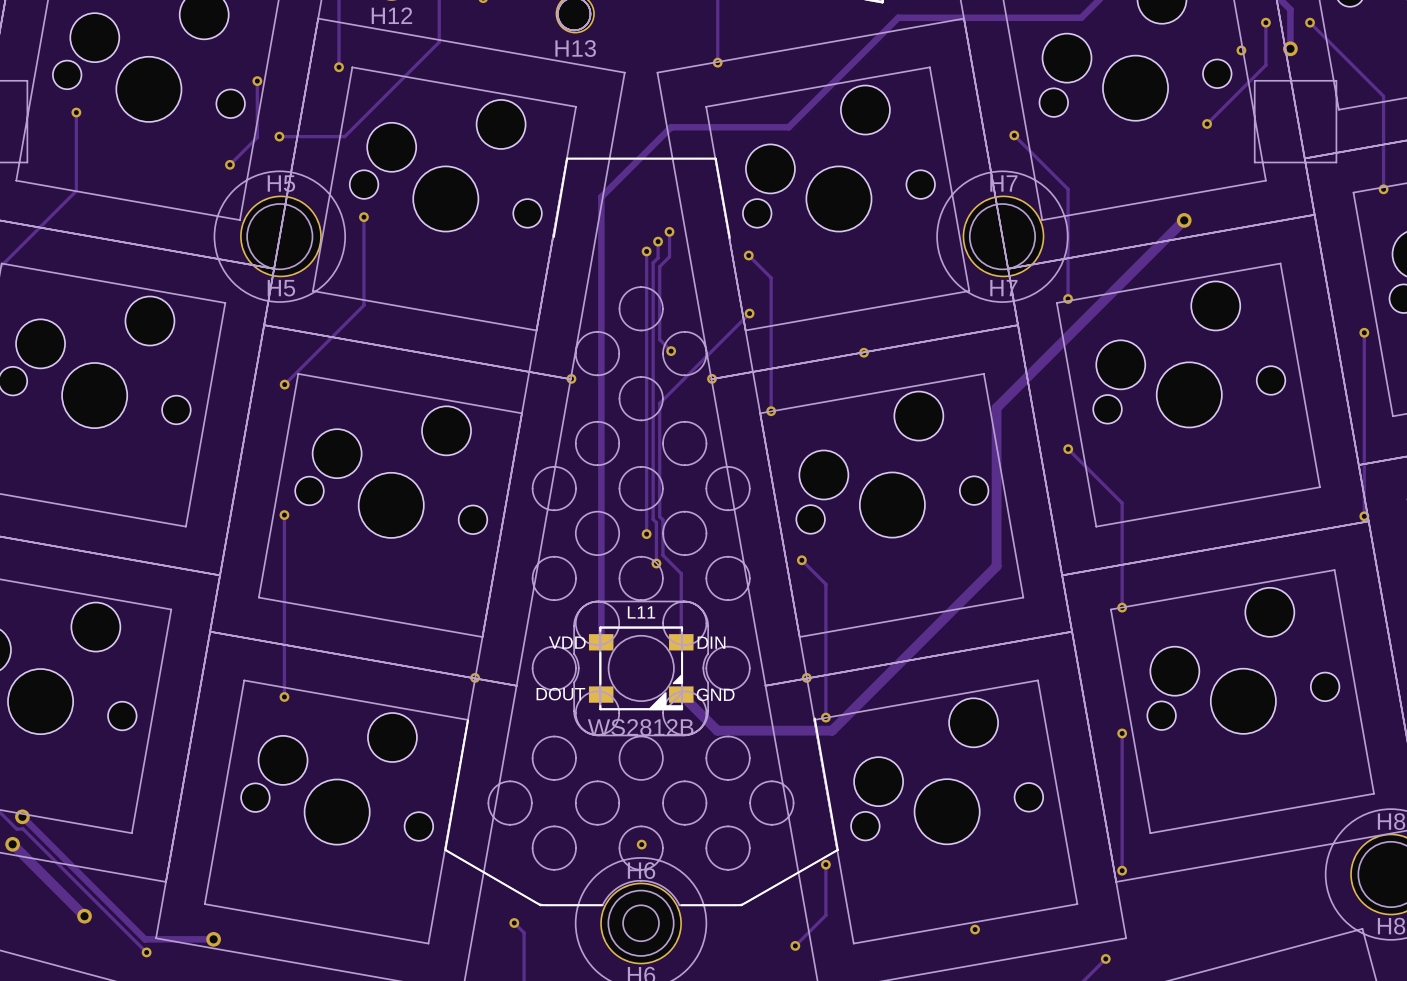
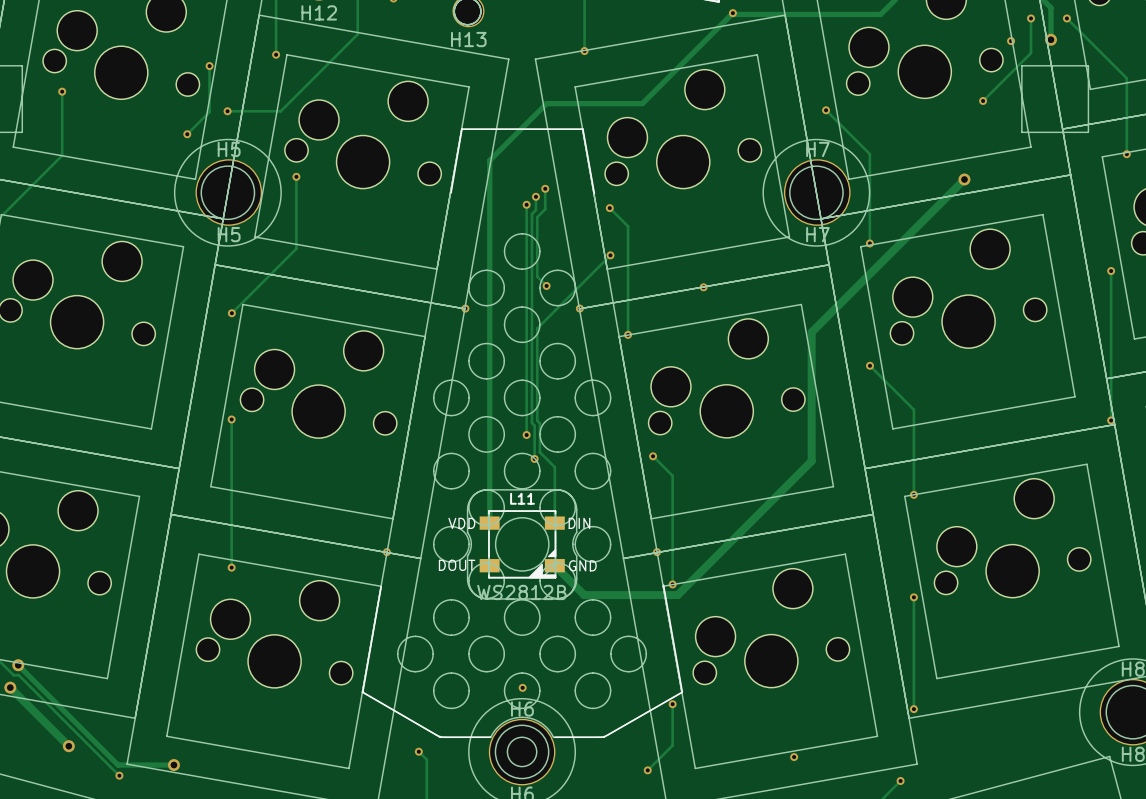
via: none -> (732, 13)

